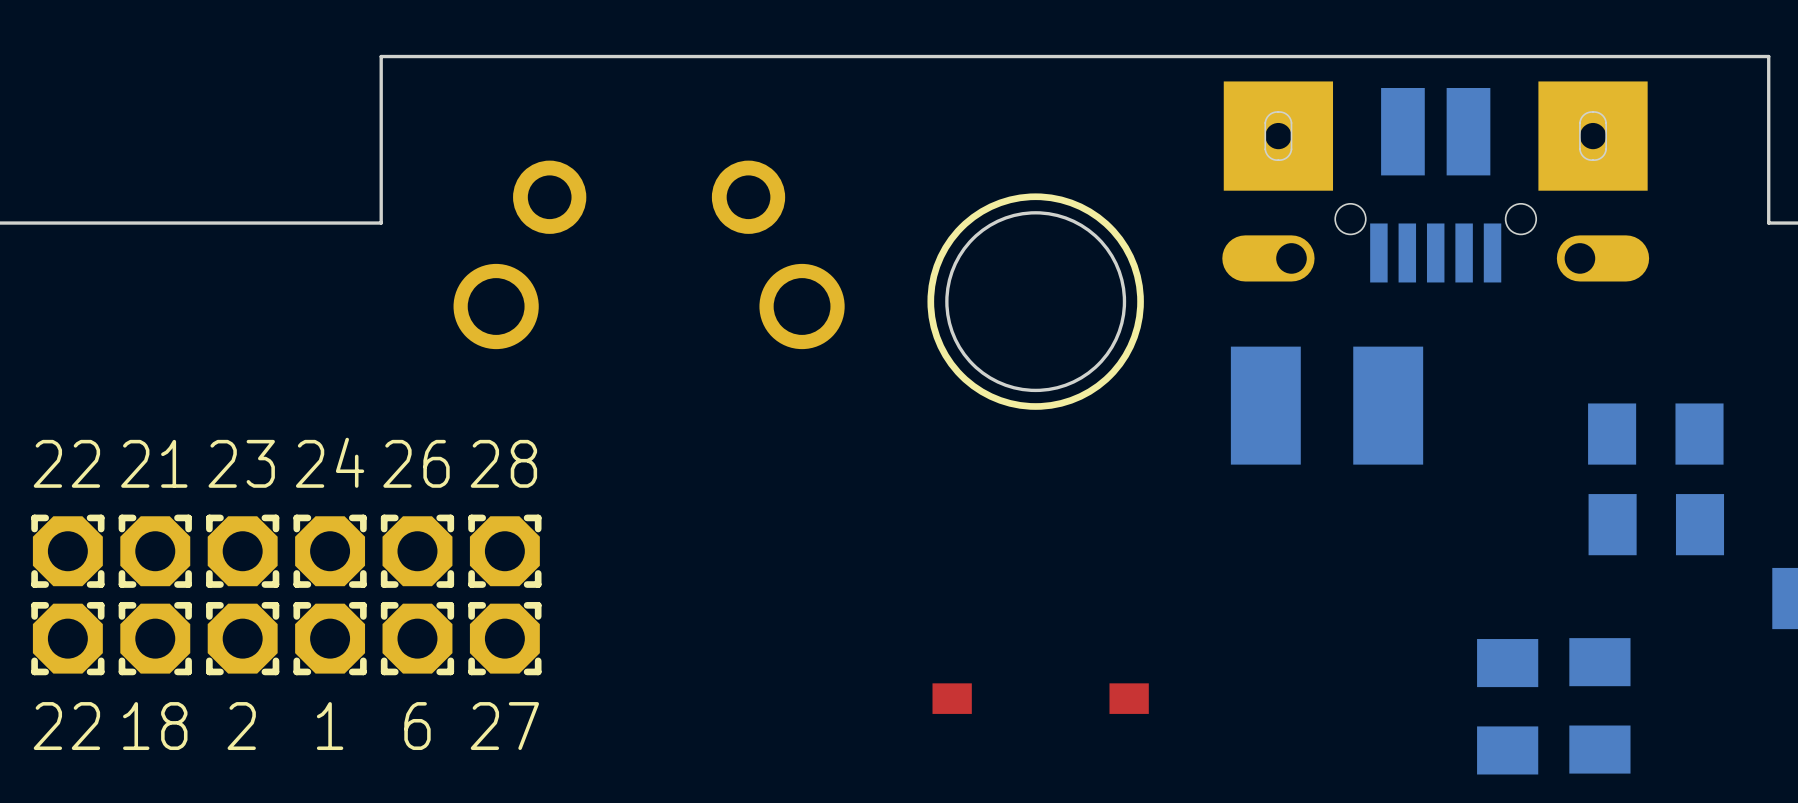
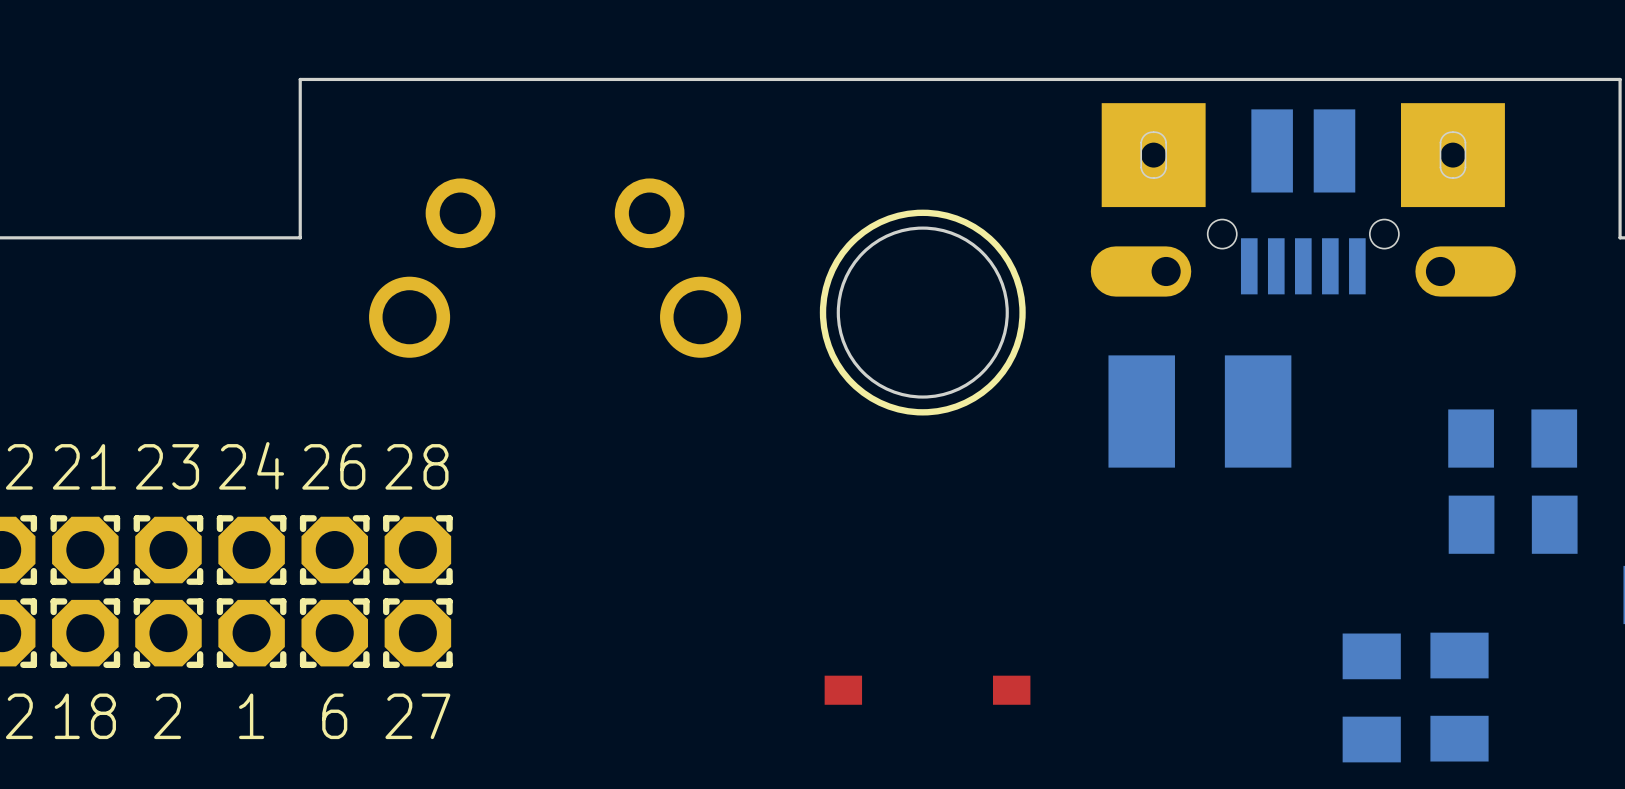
part footprint: [1222, 81, 1650, 283] -> [1090, 103, 1516, 297]

